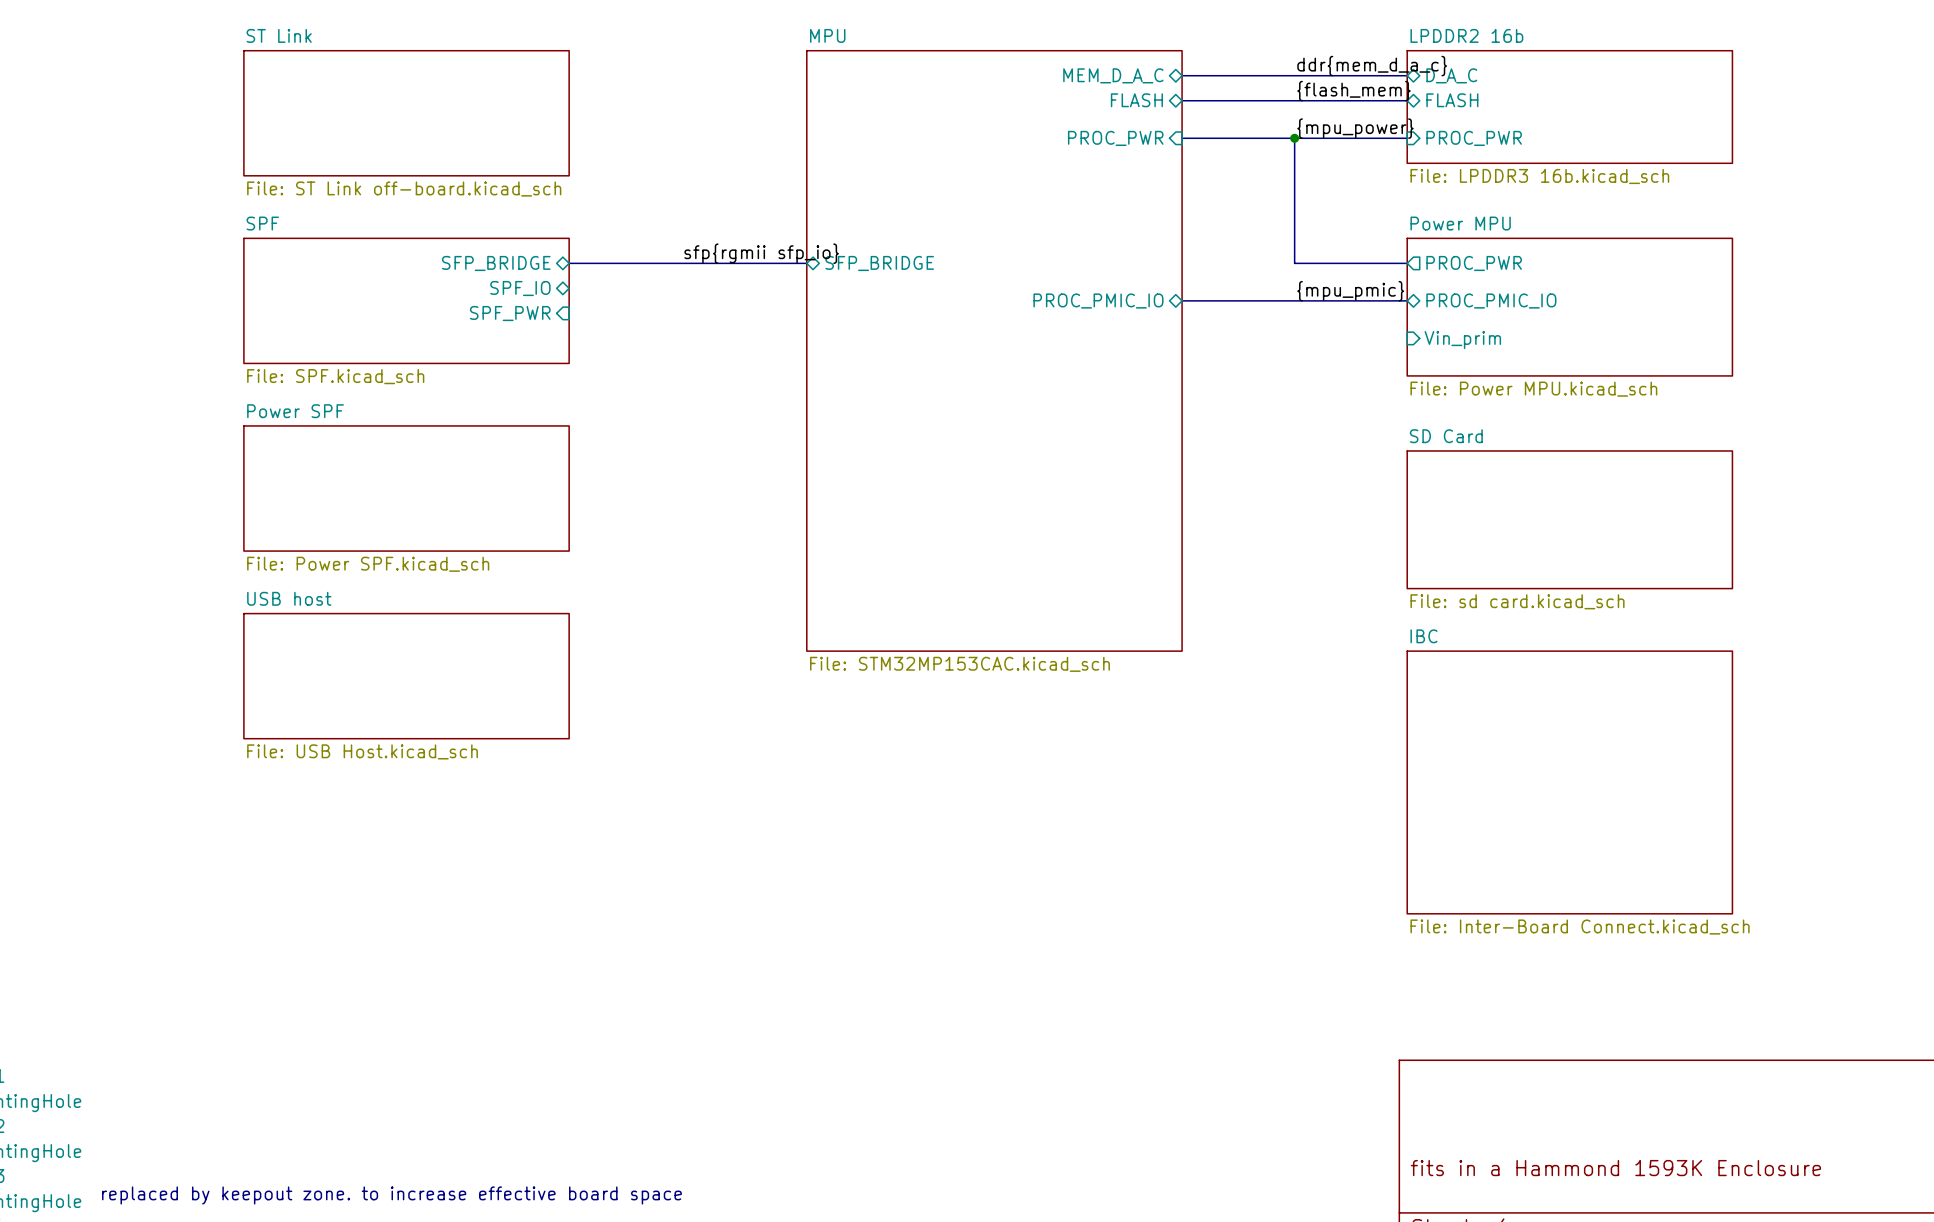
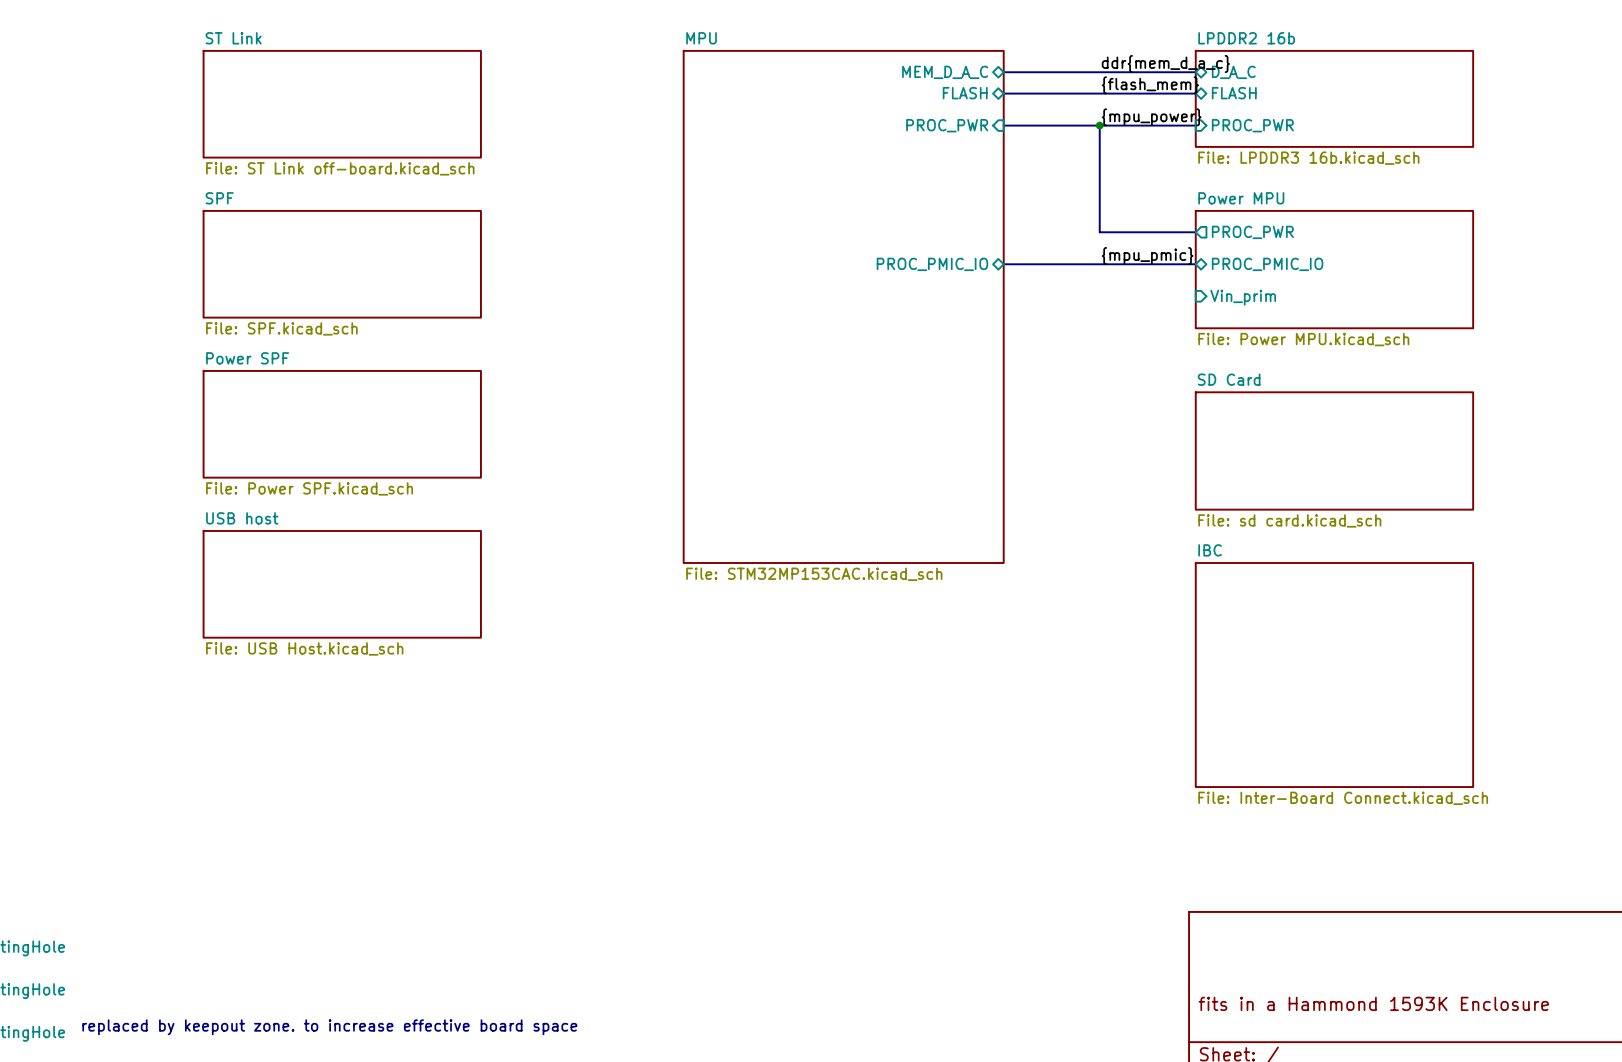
label: sfp{rgmii sfp_io} (761, 253) -> none
sheet pin: SFP_BRIDGE (496, 263) -> none
bus: (569, 263) (806, 263) -> none
sheet pin: SFP_BRIDGE (879, 263) -> none
sheet pin: SPF_IO (520, 288) -> none
sheet pin: SPF_PWR (510, 313) -> none

